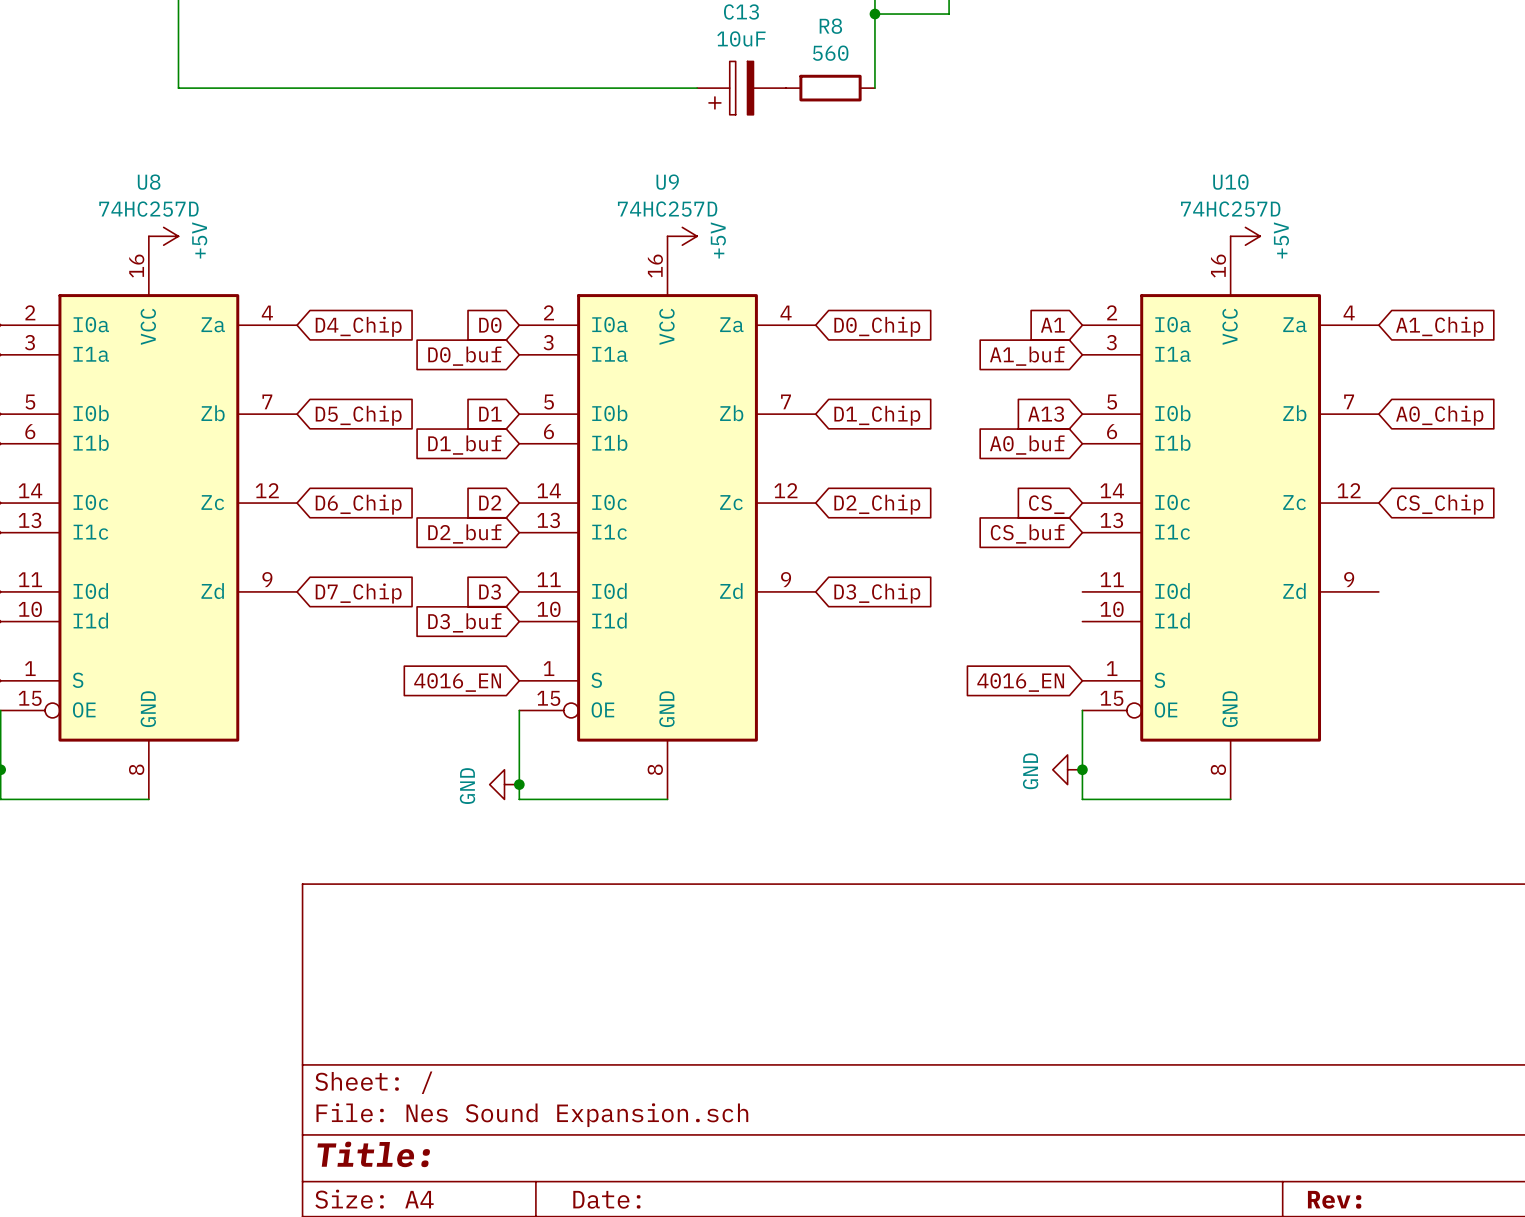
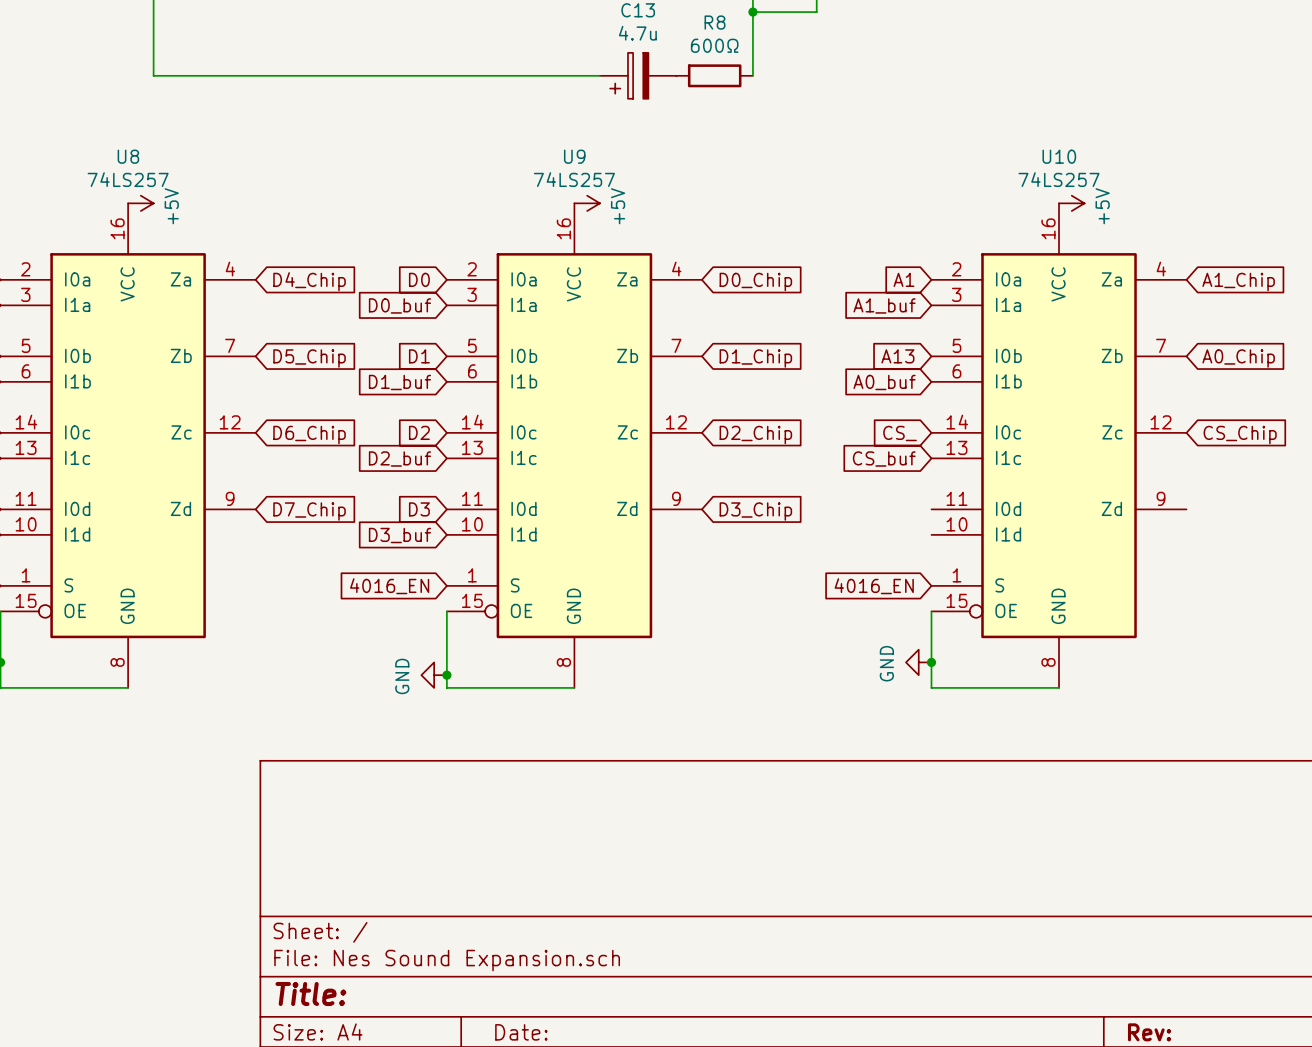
C13 value: 10uF (741, 38) -> 4.7u (637, 33)
R8 value: 560 (830, 53) -> 600Ω (714, 45)
U8 value: 74HC257D (148, 209) -> 74LS257 (128, 179)
U9 value: 74HC257D (667, 209) -> 74LS257 (574, 179)
U10 value: 74HC257D (1230, 209) -> 74LS257 (1059, 179)

